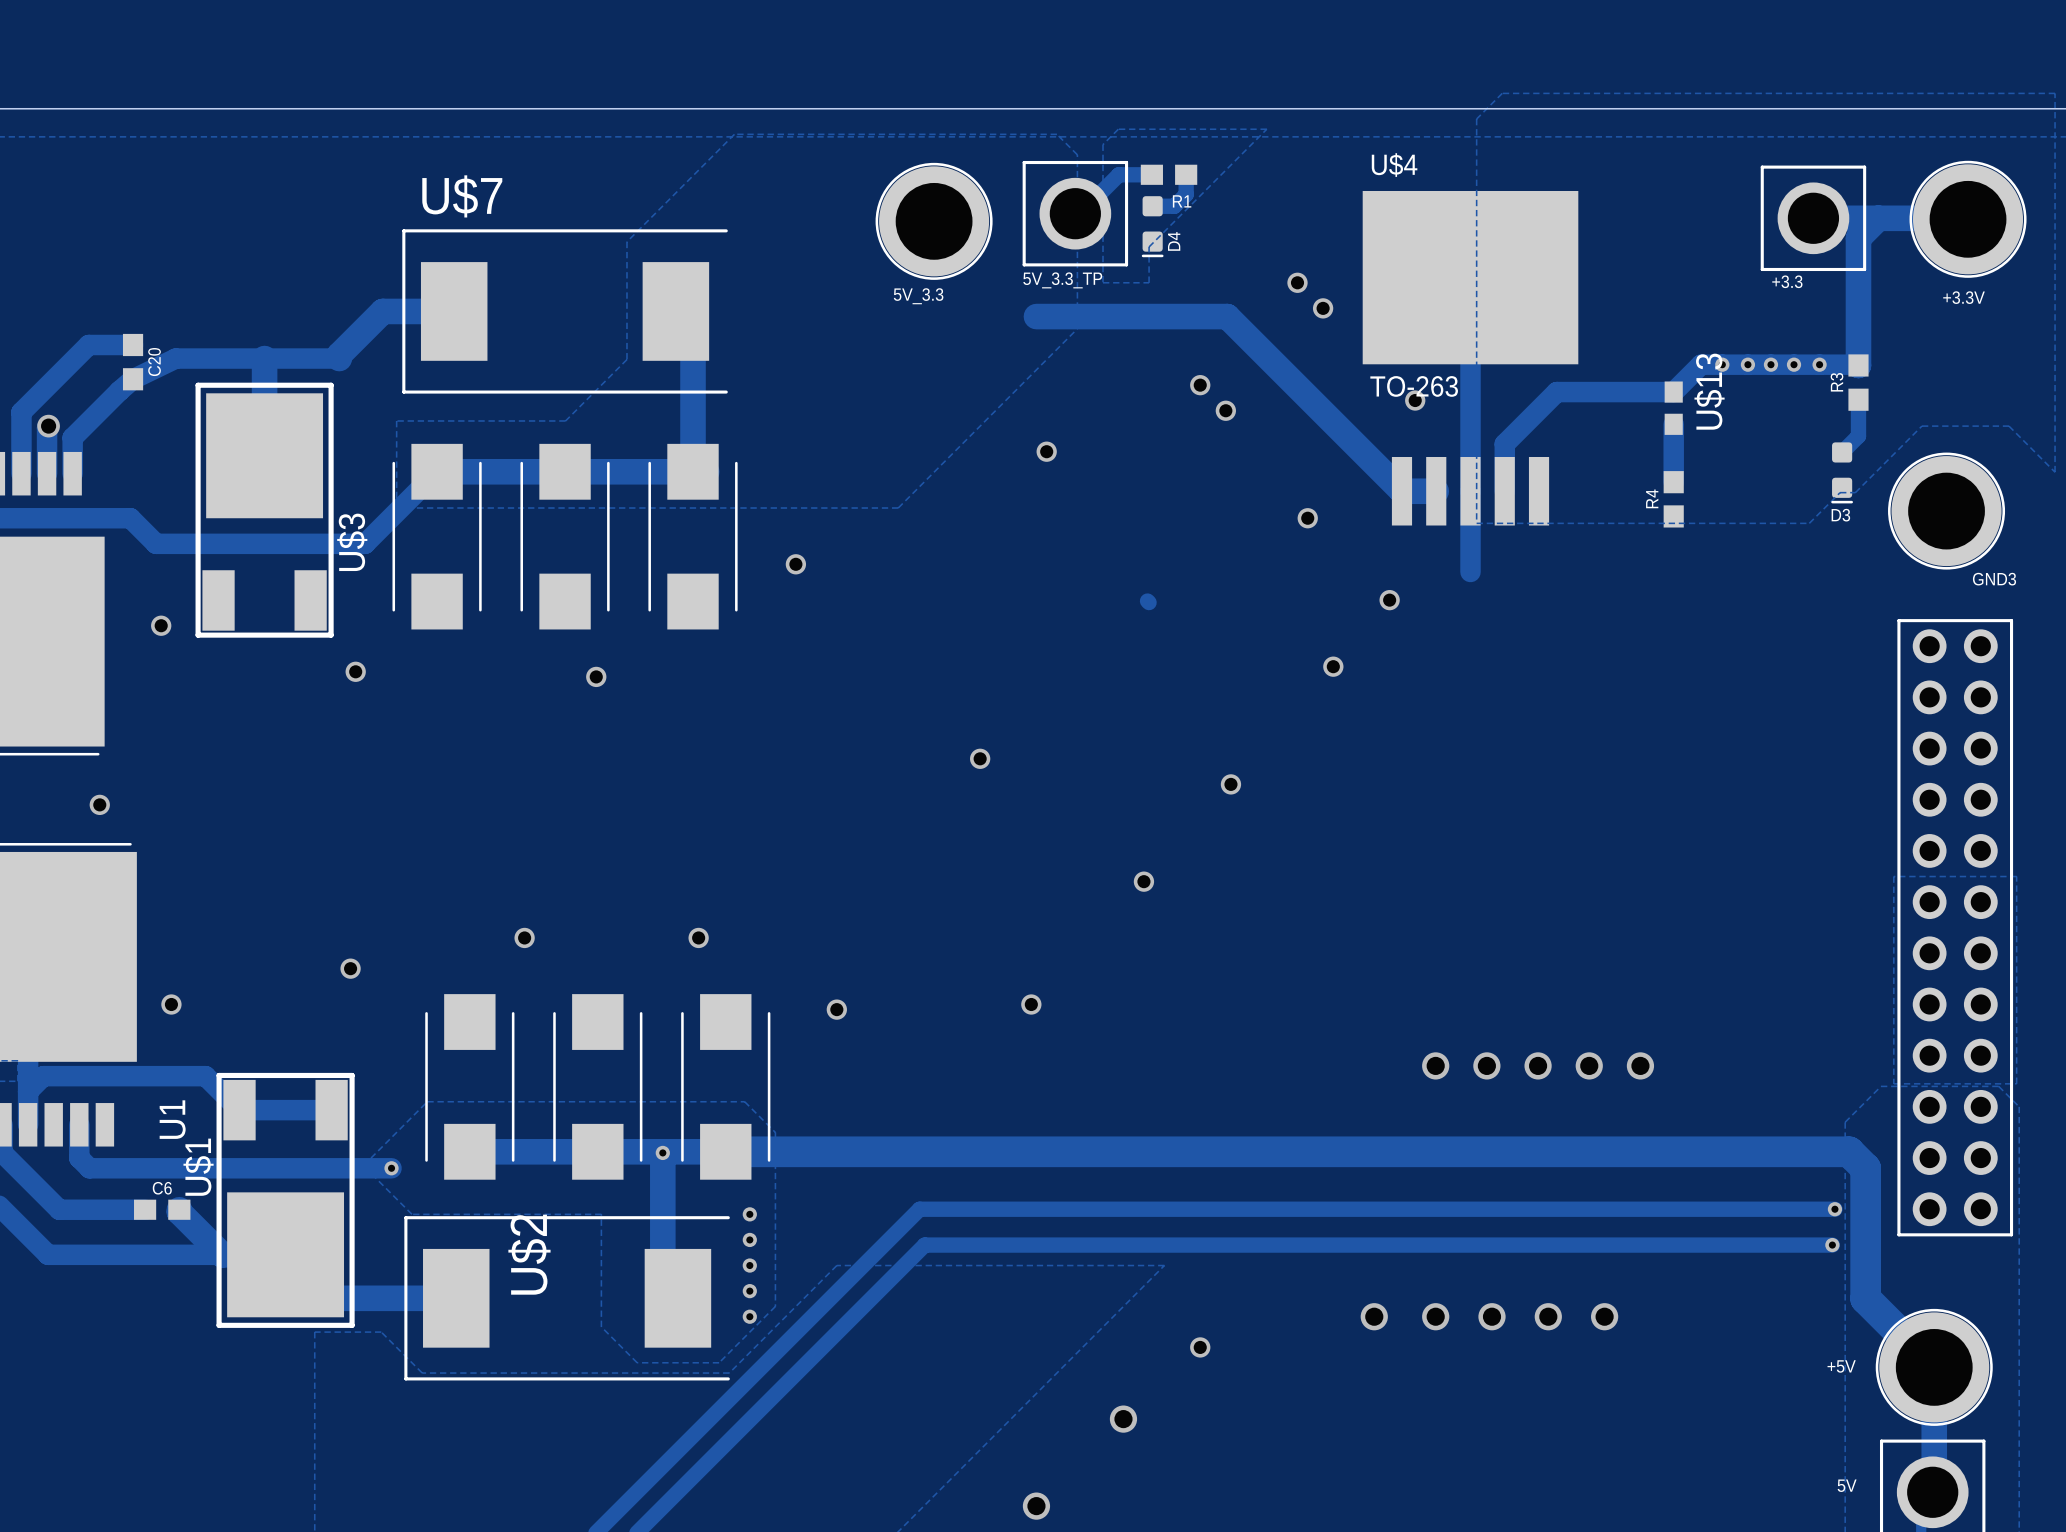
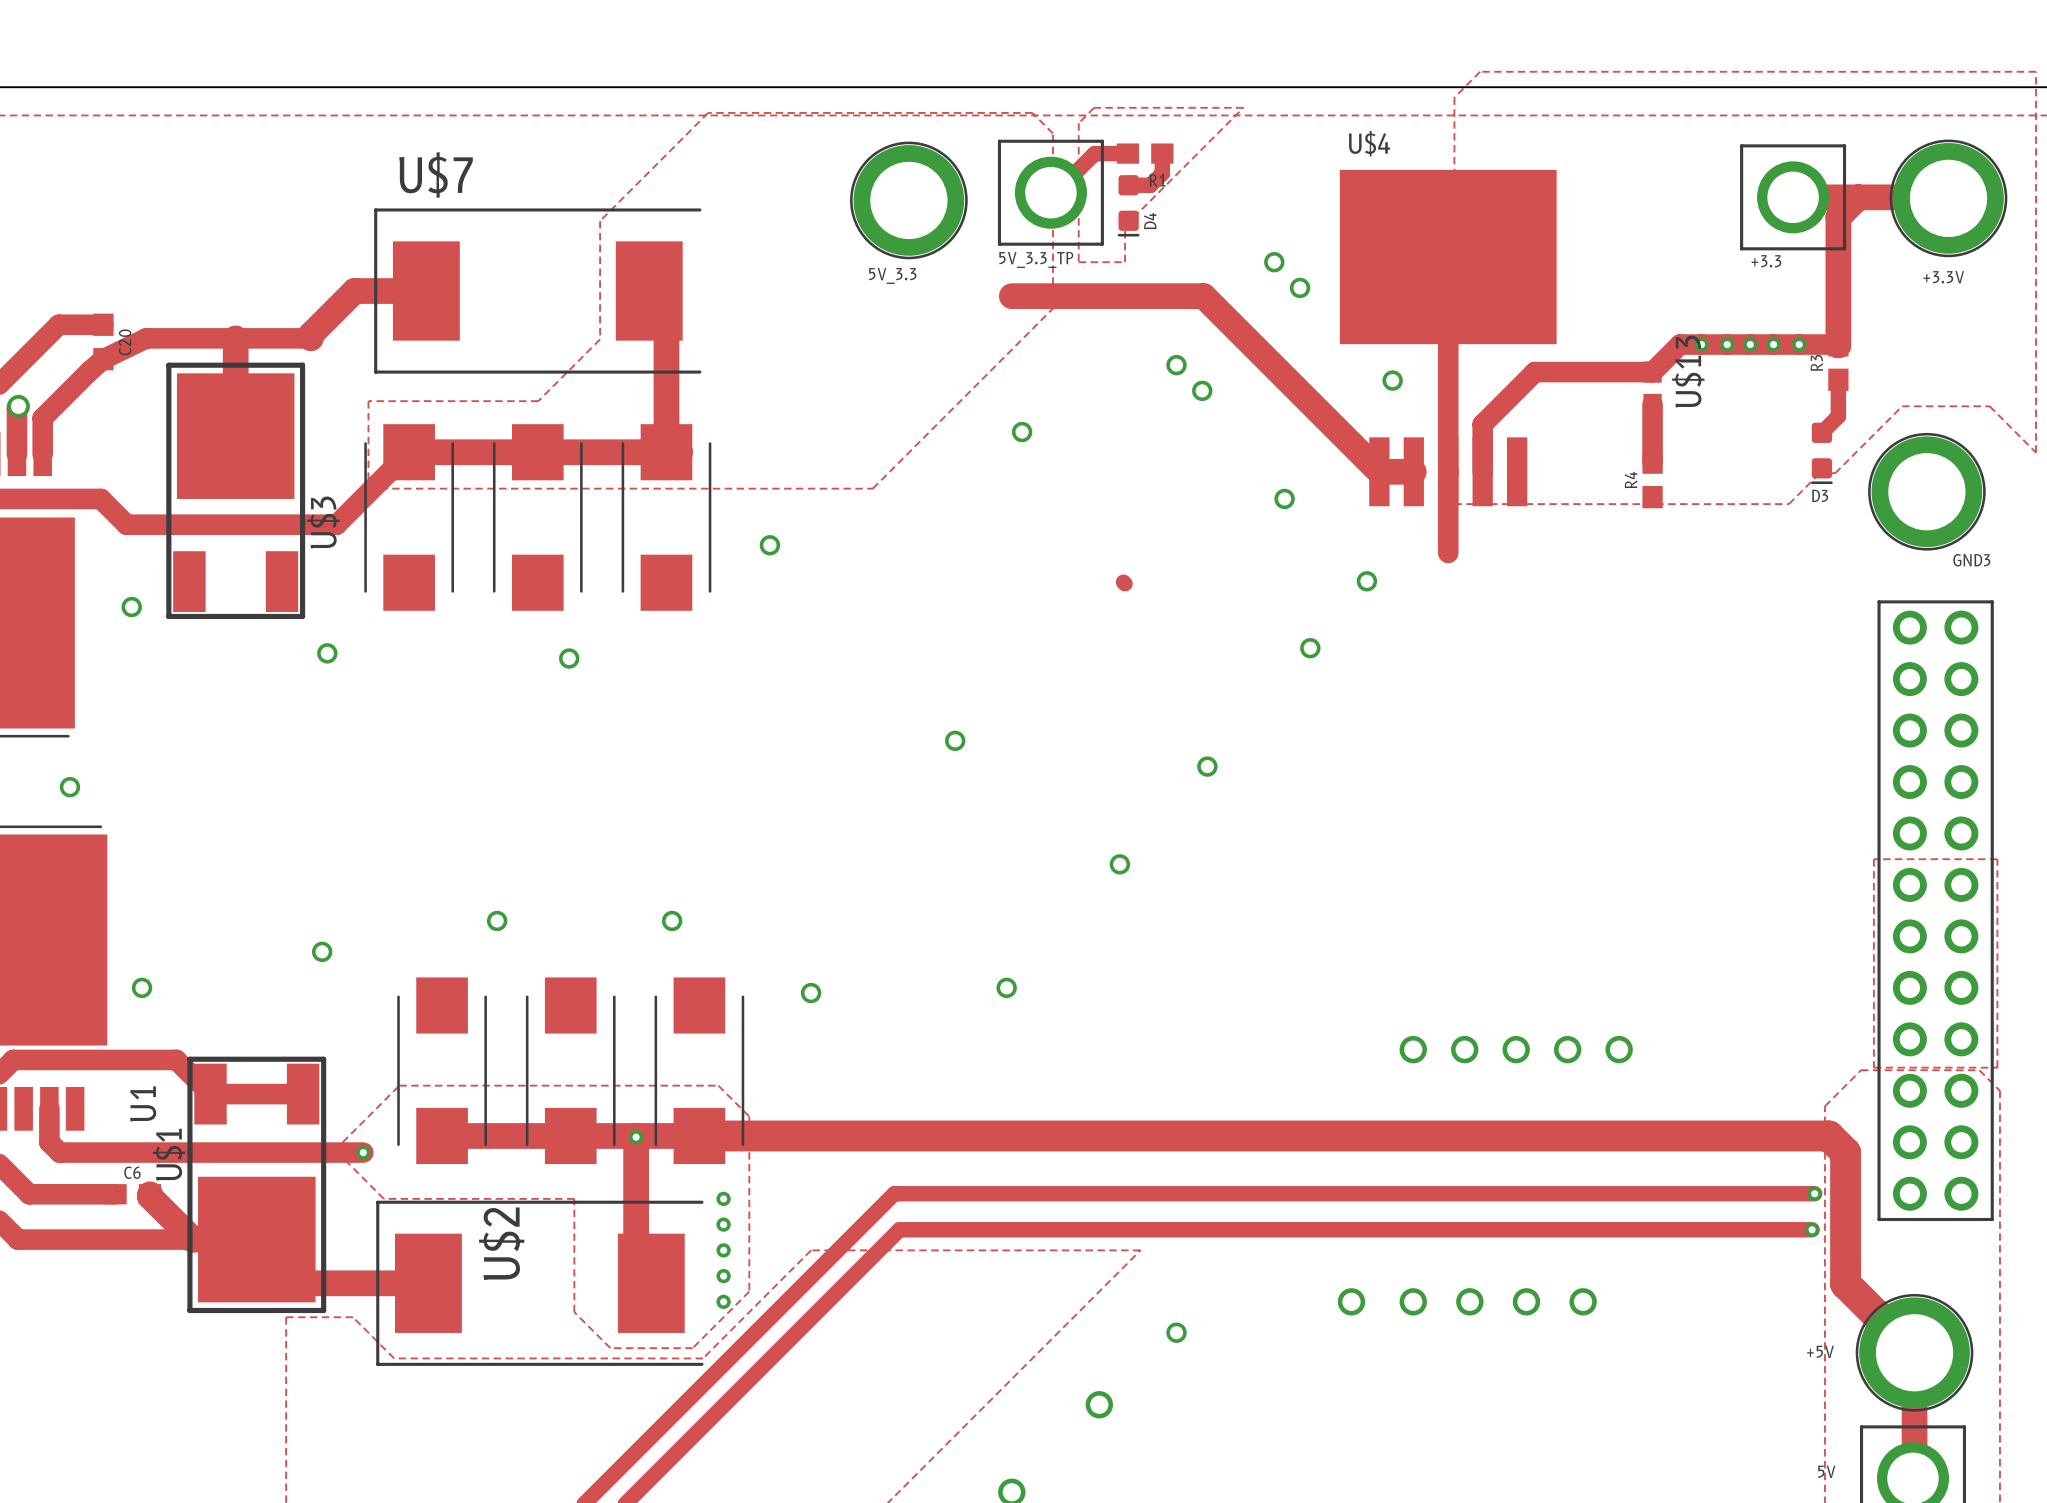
U$4 value: TO-263 (1414, 386) -> none

